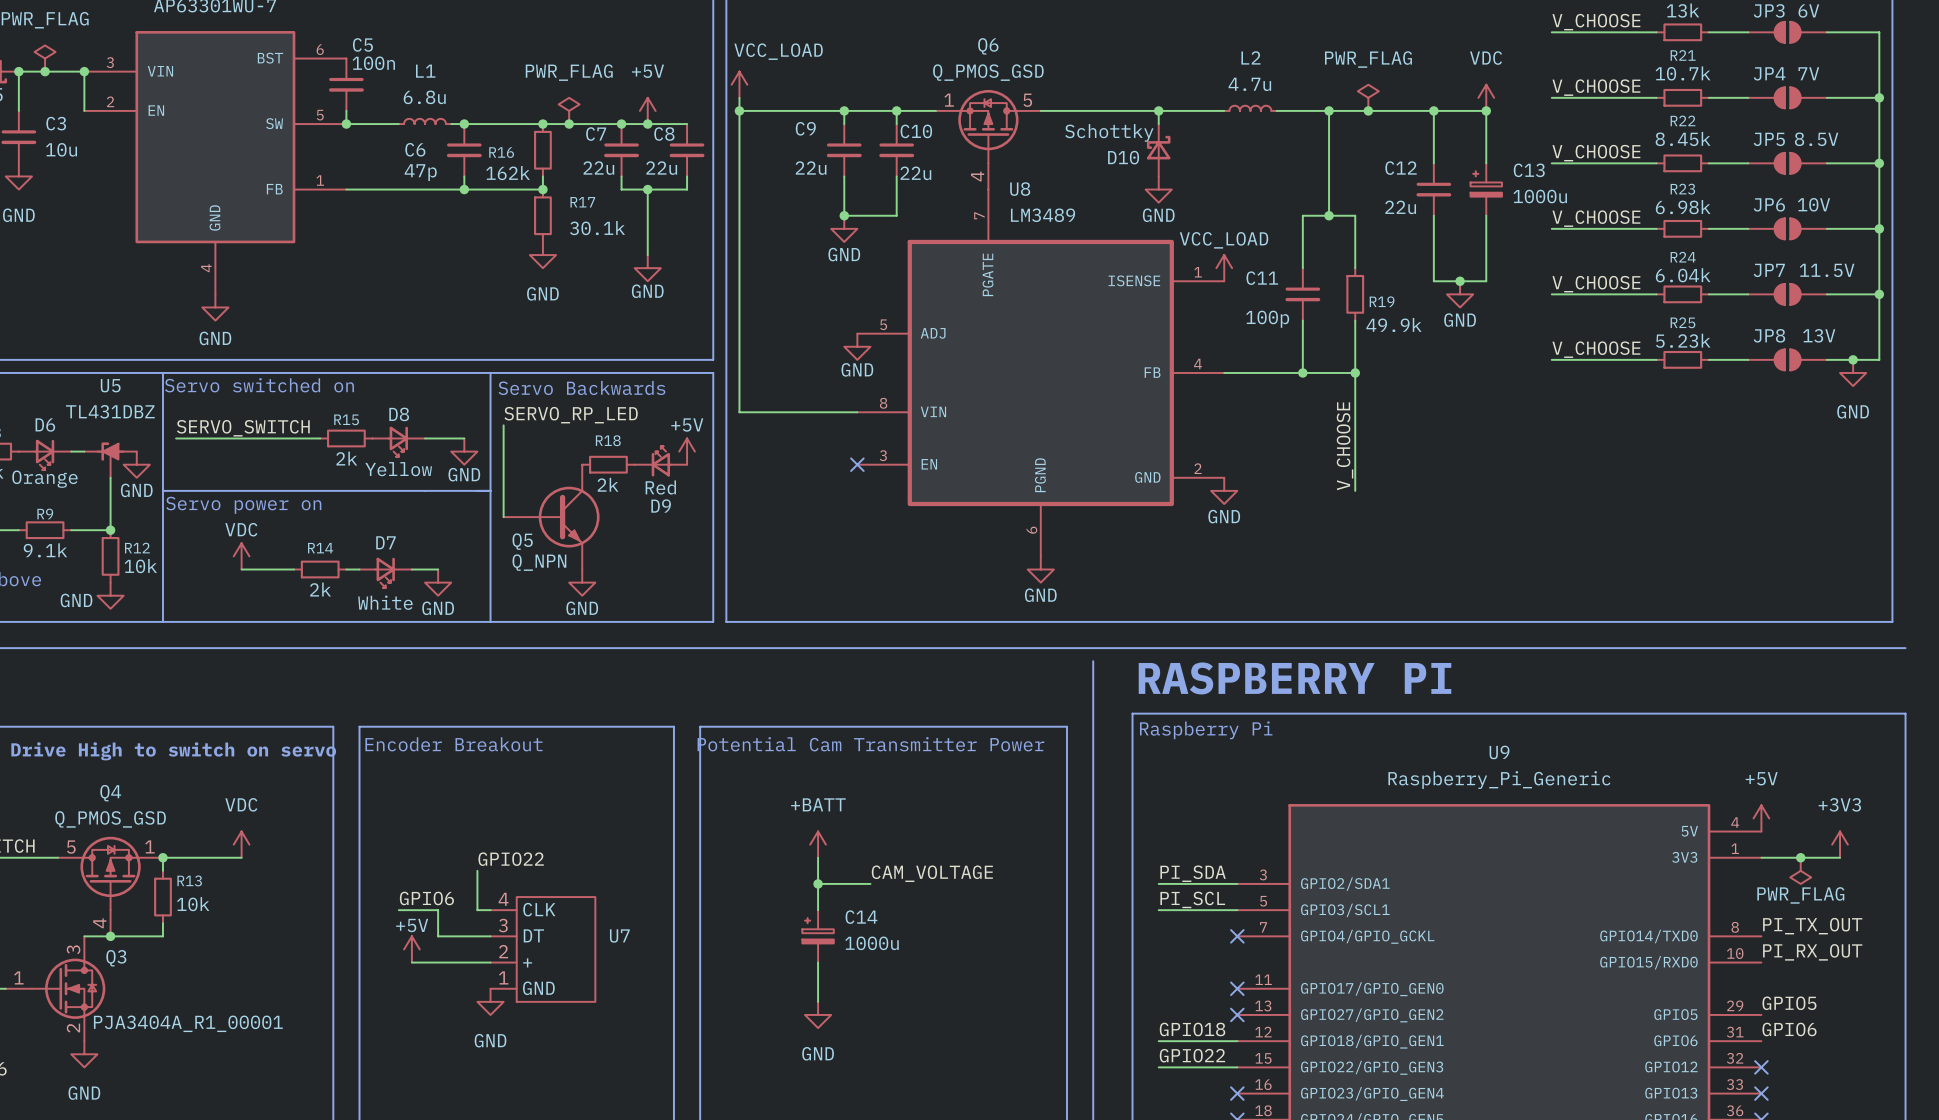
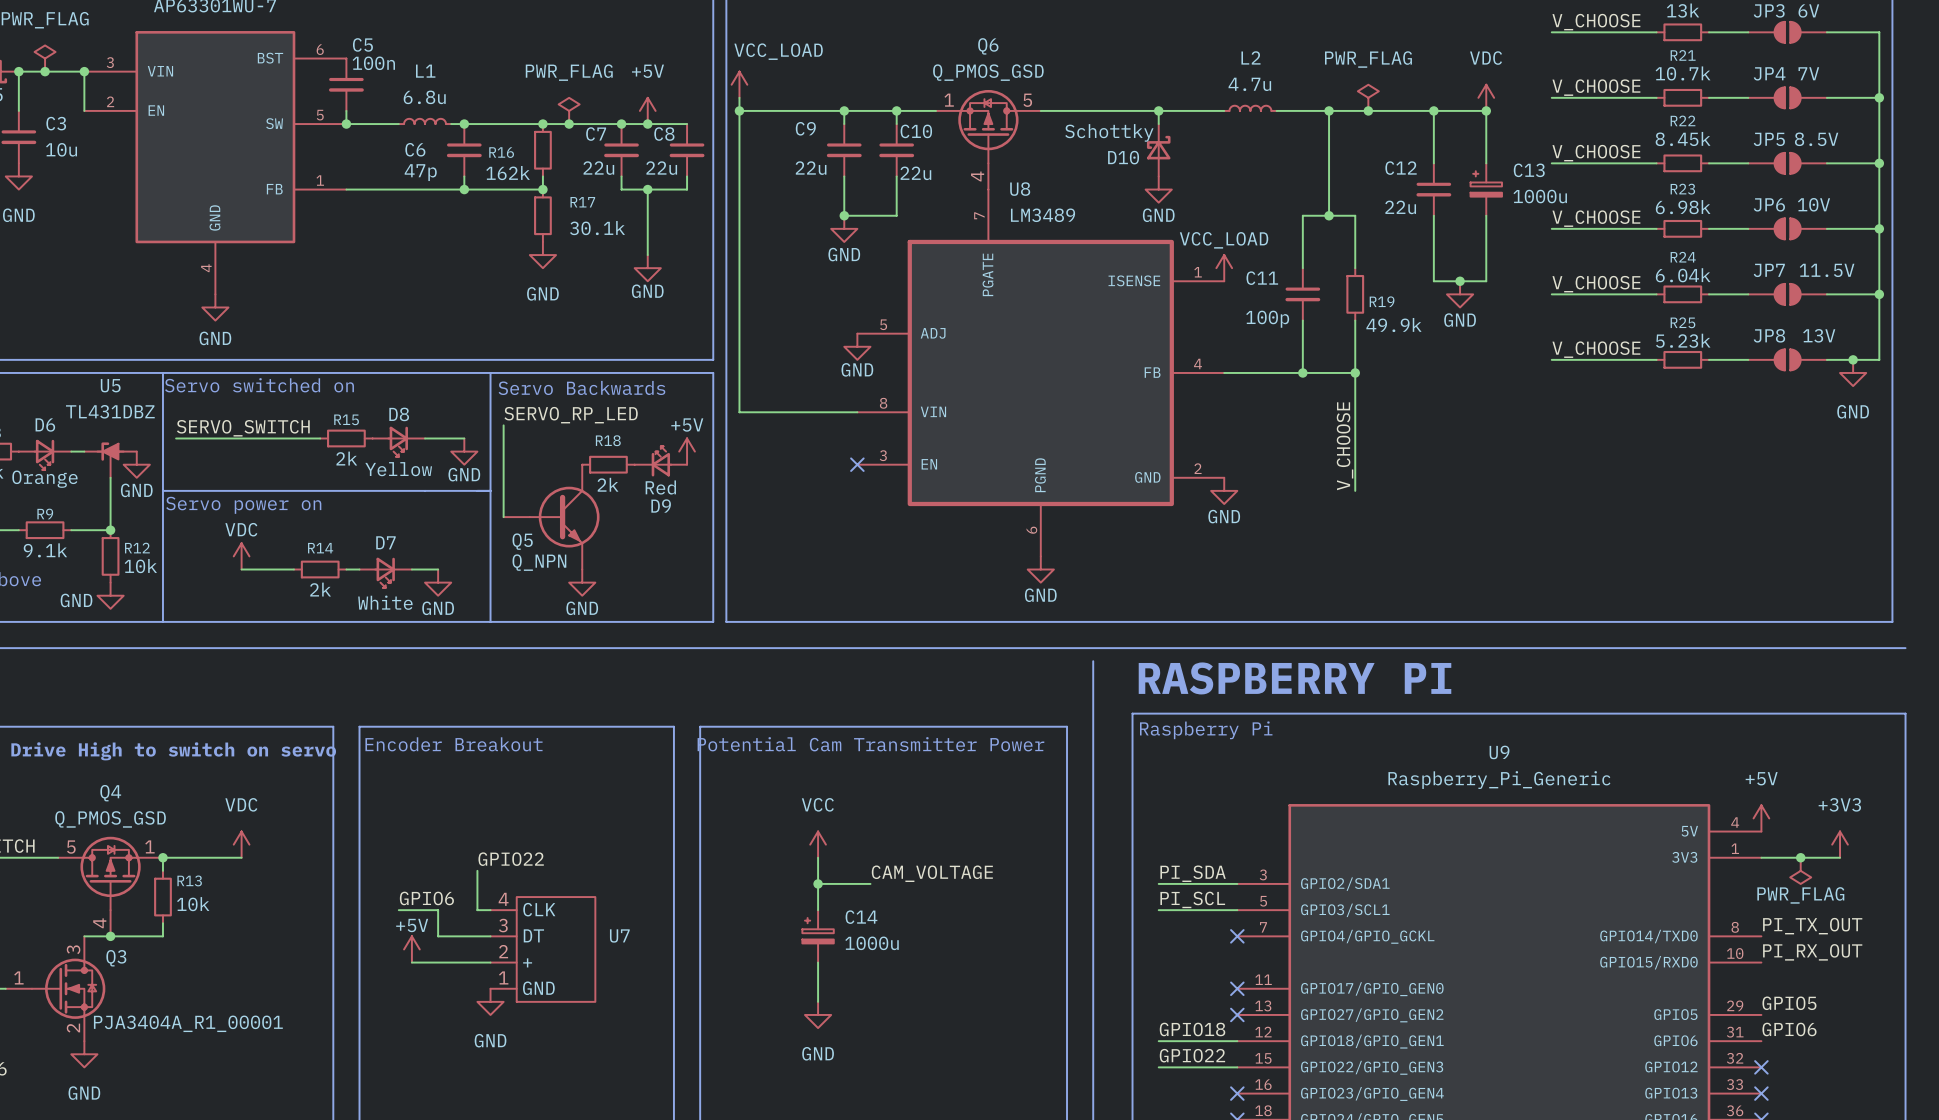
power symbol: +BATT (818, 844) -> VCC (818, 844)

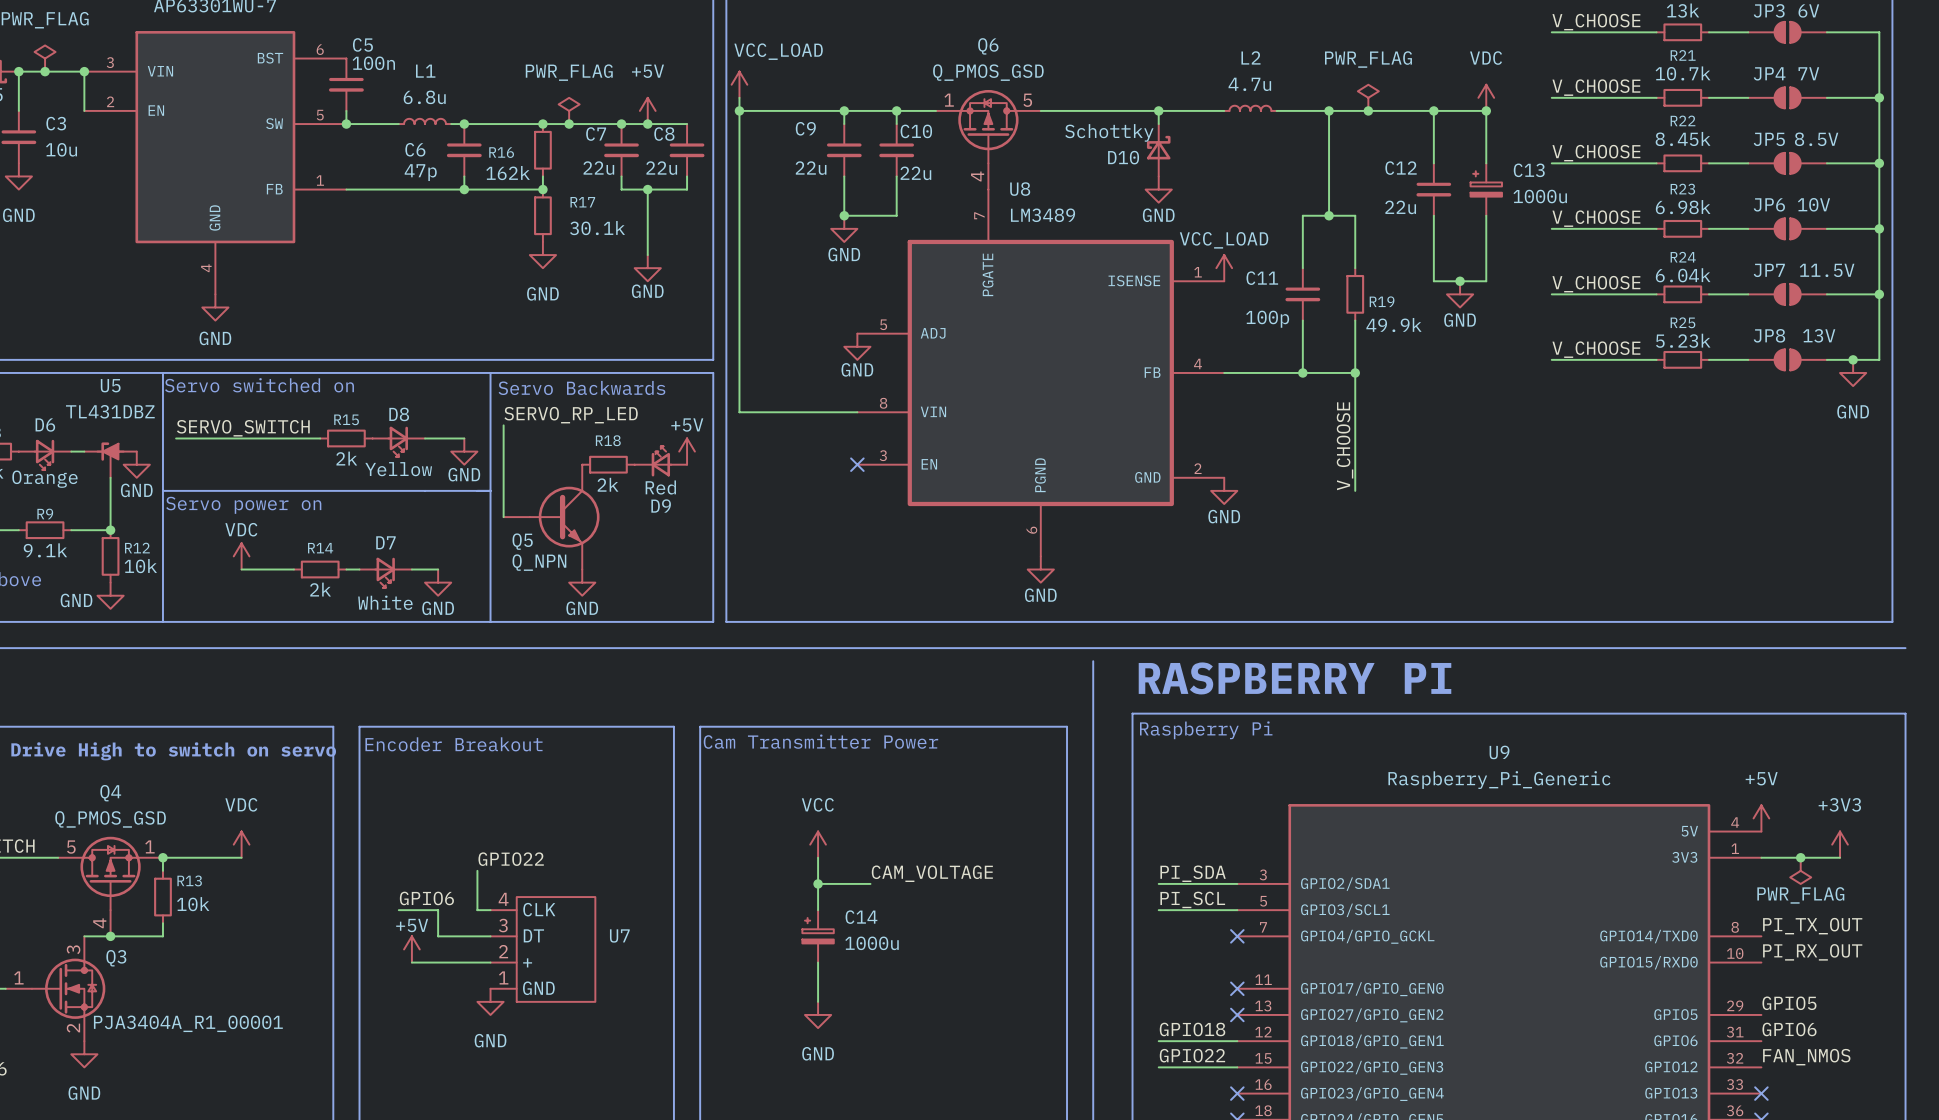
text: Potential Cam Transmitter Power (870, 744) -> Cam Transmitter Power (820, 741)
label: none -> FAN_NMOS (1806, 1057)
no-connect mark: (1761, 1067) -> none

